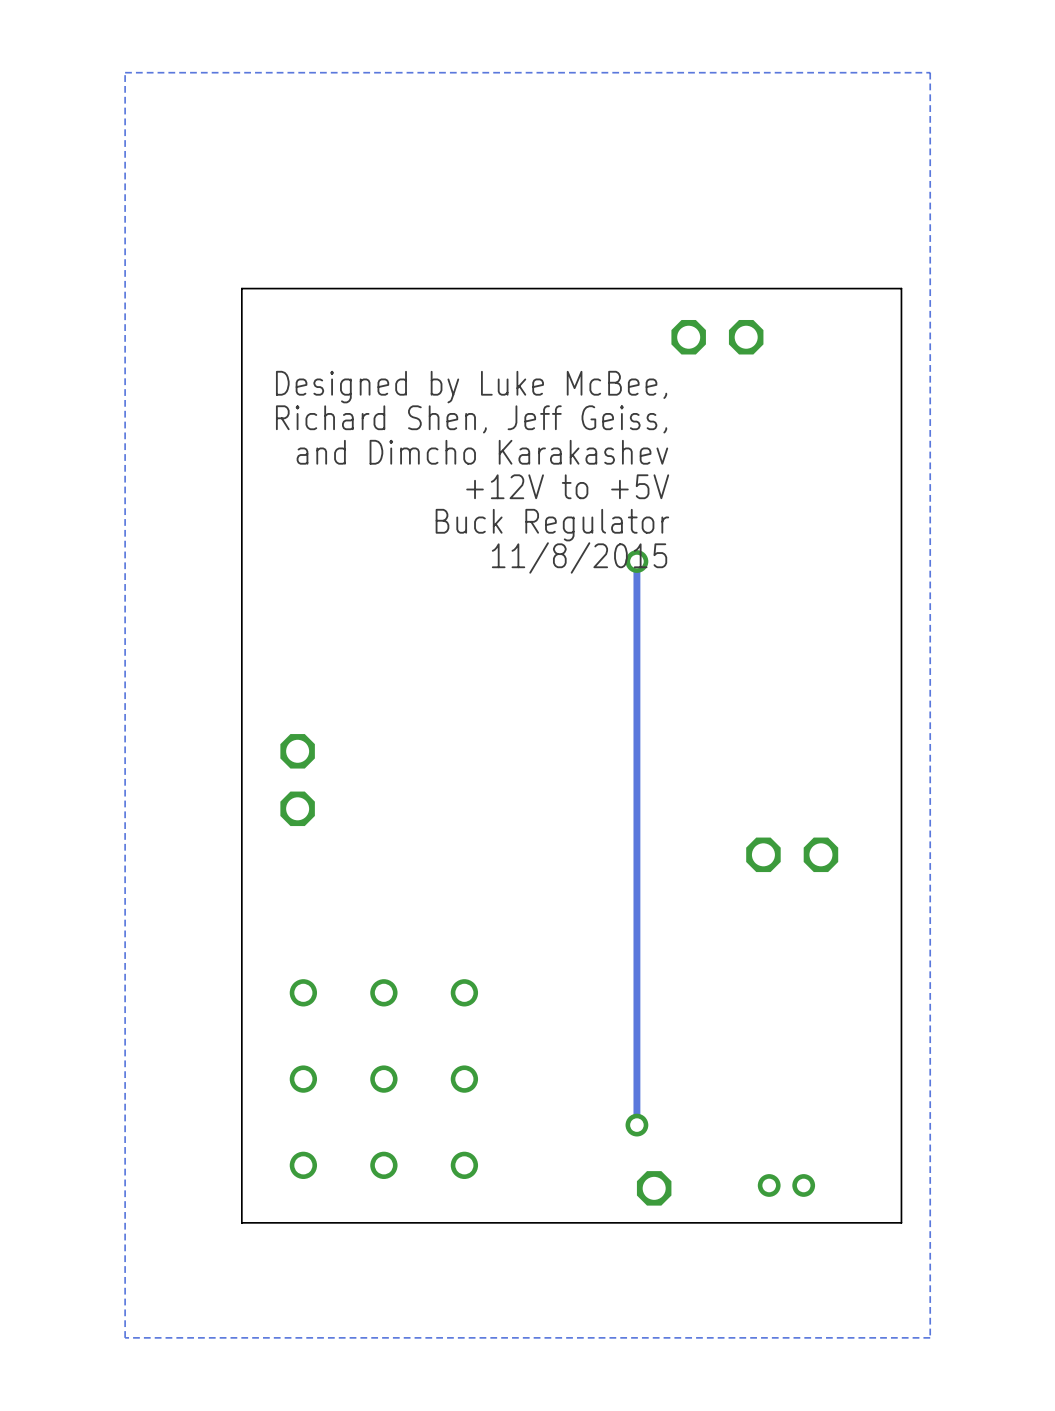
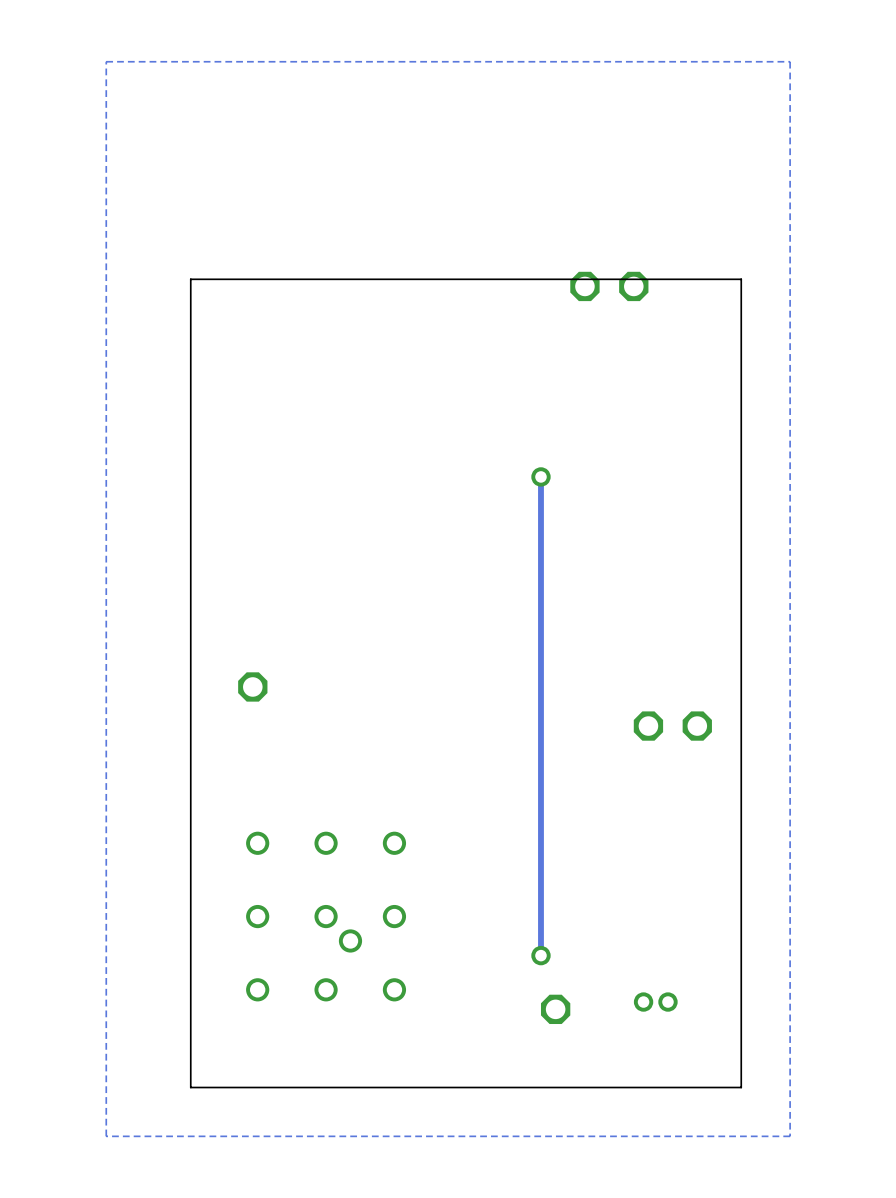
board edge: (901, 288) (241, 288) (241, 1222) (901, 1222) (901, 288) -> (741, 279) (741, 1087) (190, 1087) (190, 279) (741, 279)
text: Designed by Luke McBee, (471, 387) -> none
text: Richard Shen, Jeff Geiss, (471, 419) -> none
text: and Dimcho Karakashev (482, 452) -> none
text: +12V to +5V (567, 486) -> none
text: Buck Regulator (552, 525) -> none
text: 11/8/2015 (579, 557) -> none
part: (297, 751) -> none
via: none -> (350, 940)
via: none -> (643, 1002)
via: none -> (667, 1002)
via: (769, 1185) -> none
via: (803, 1185) -> none

